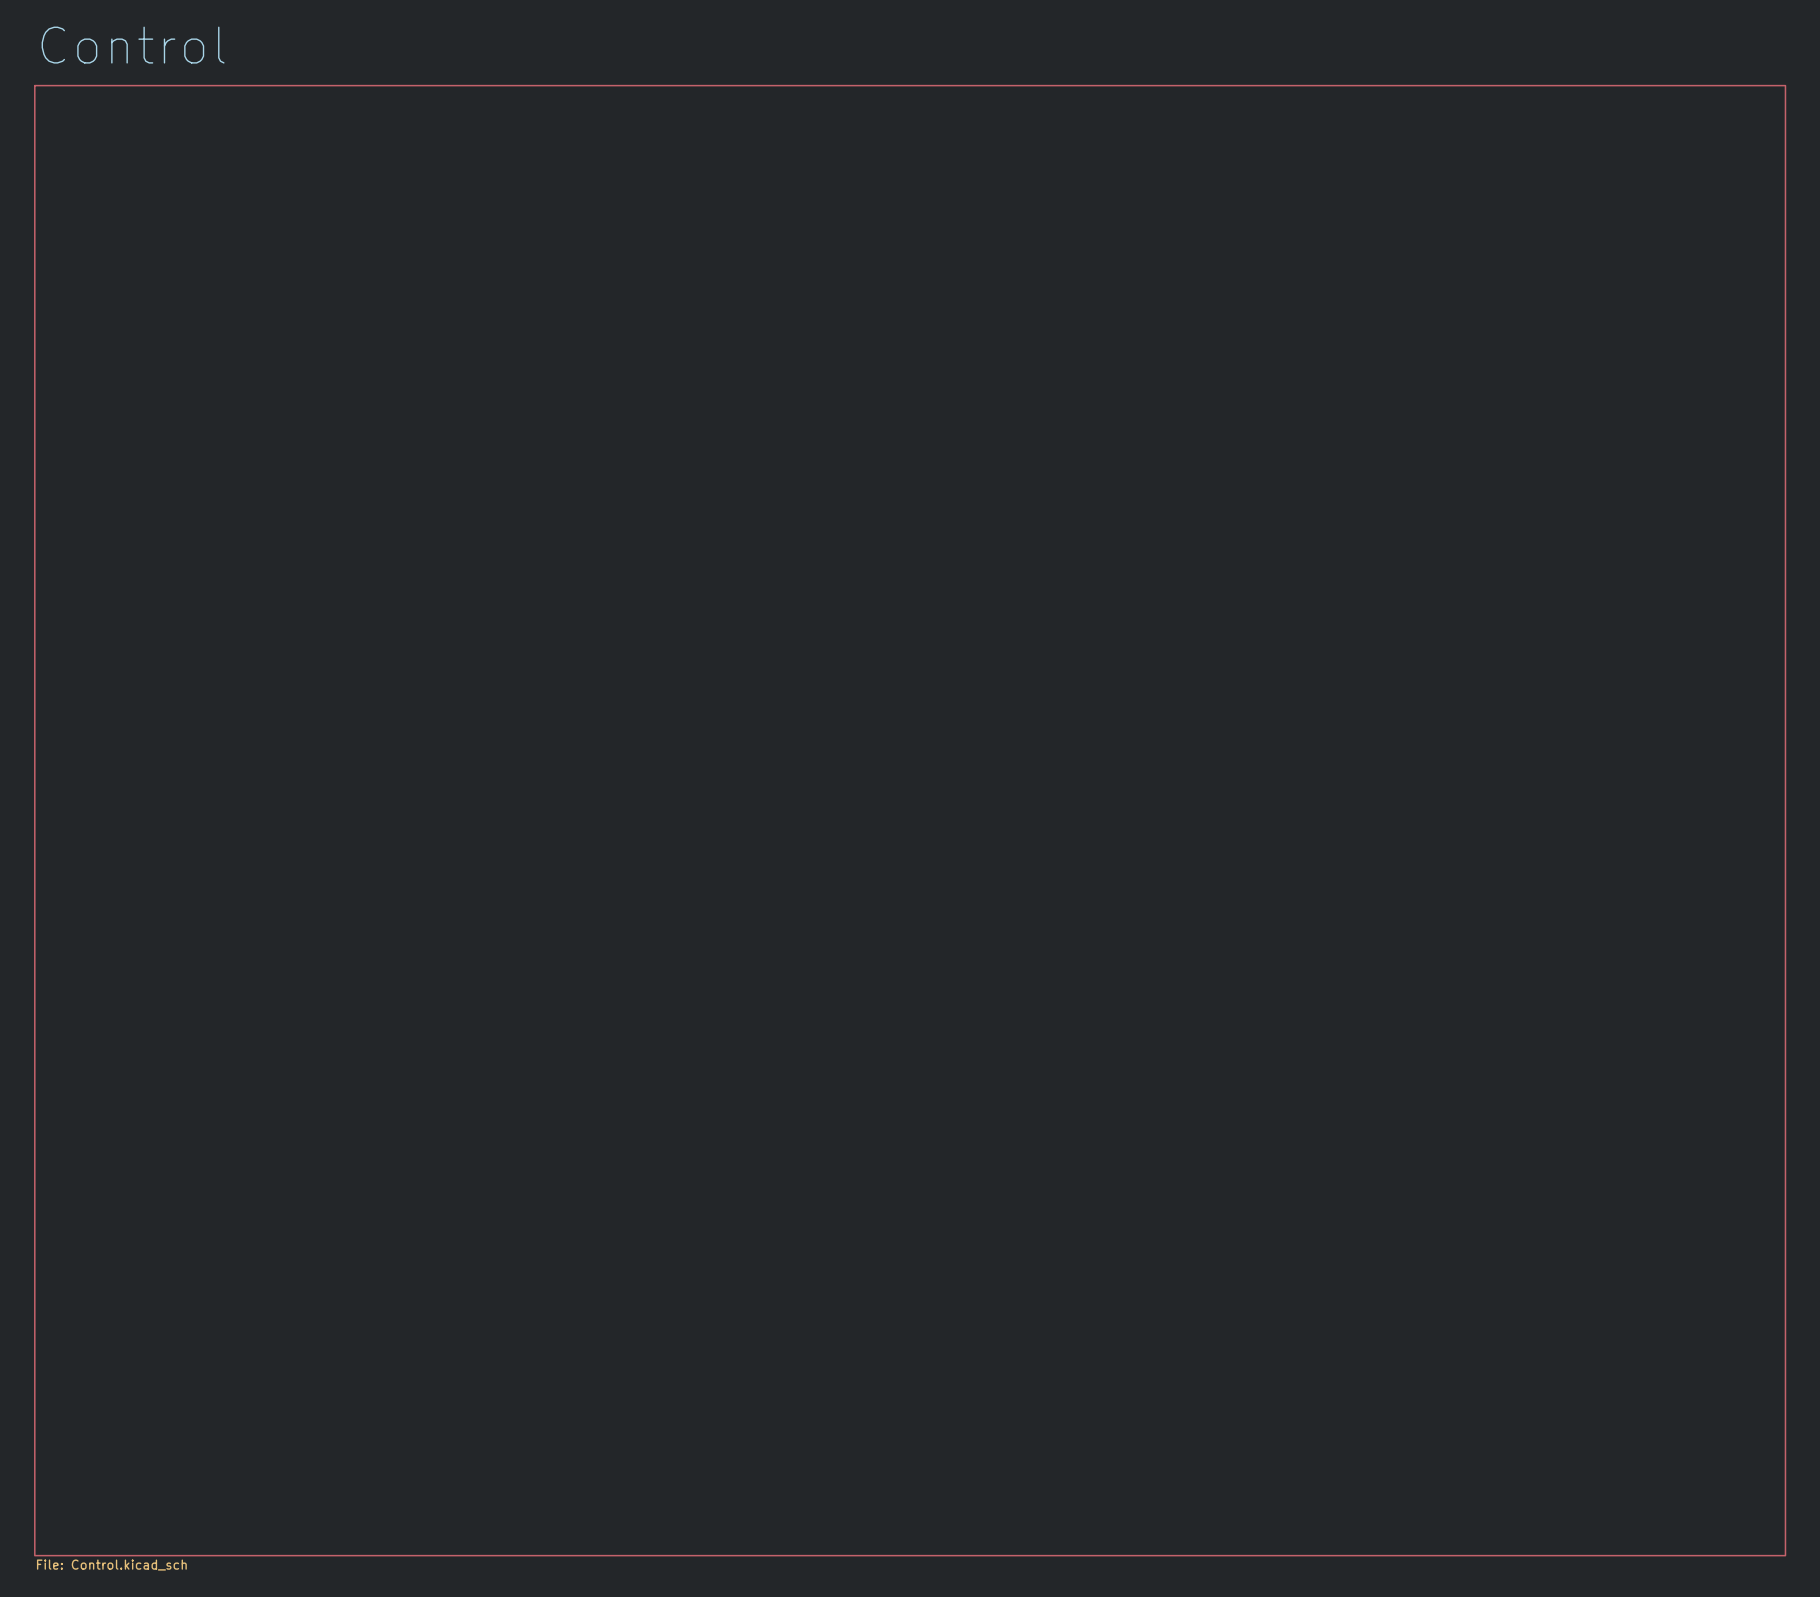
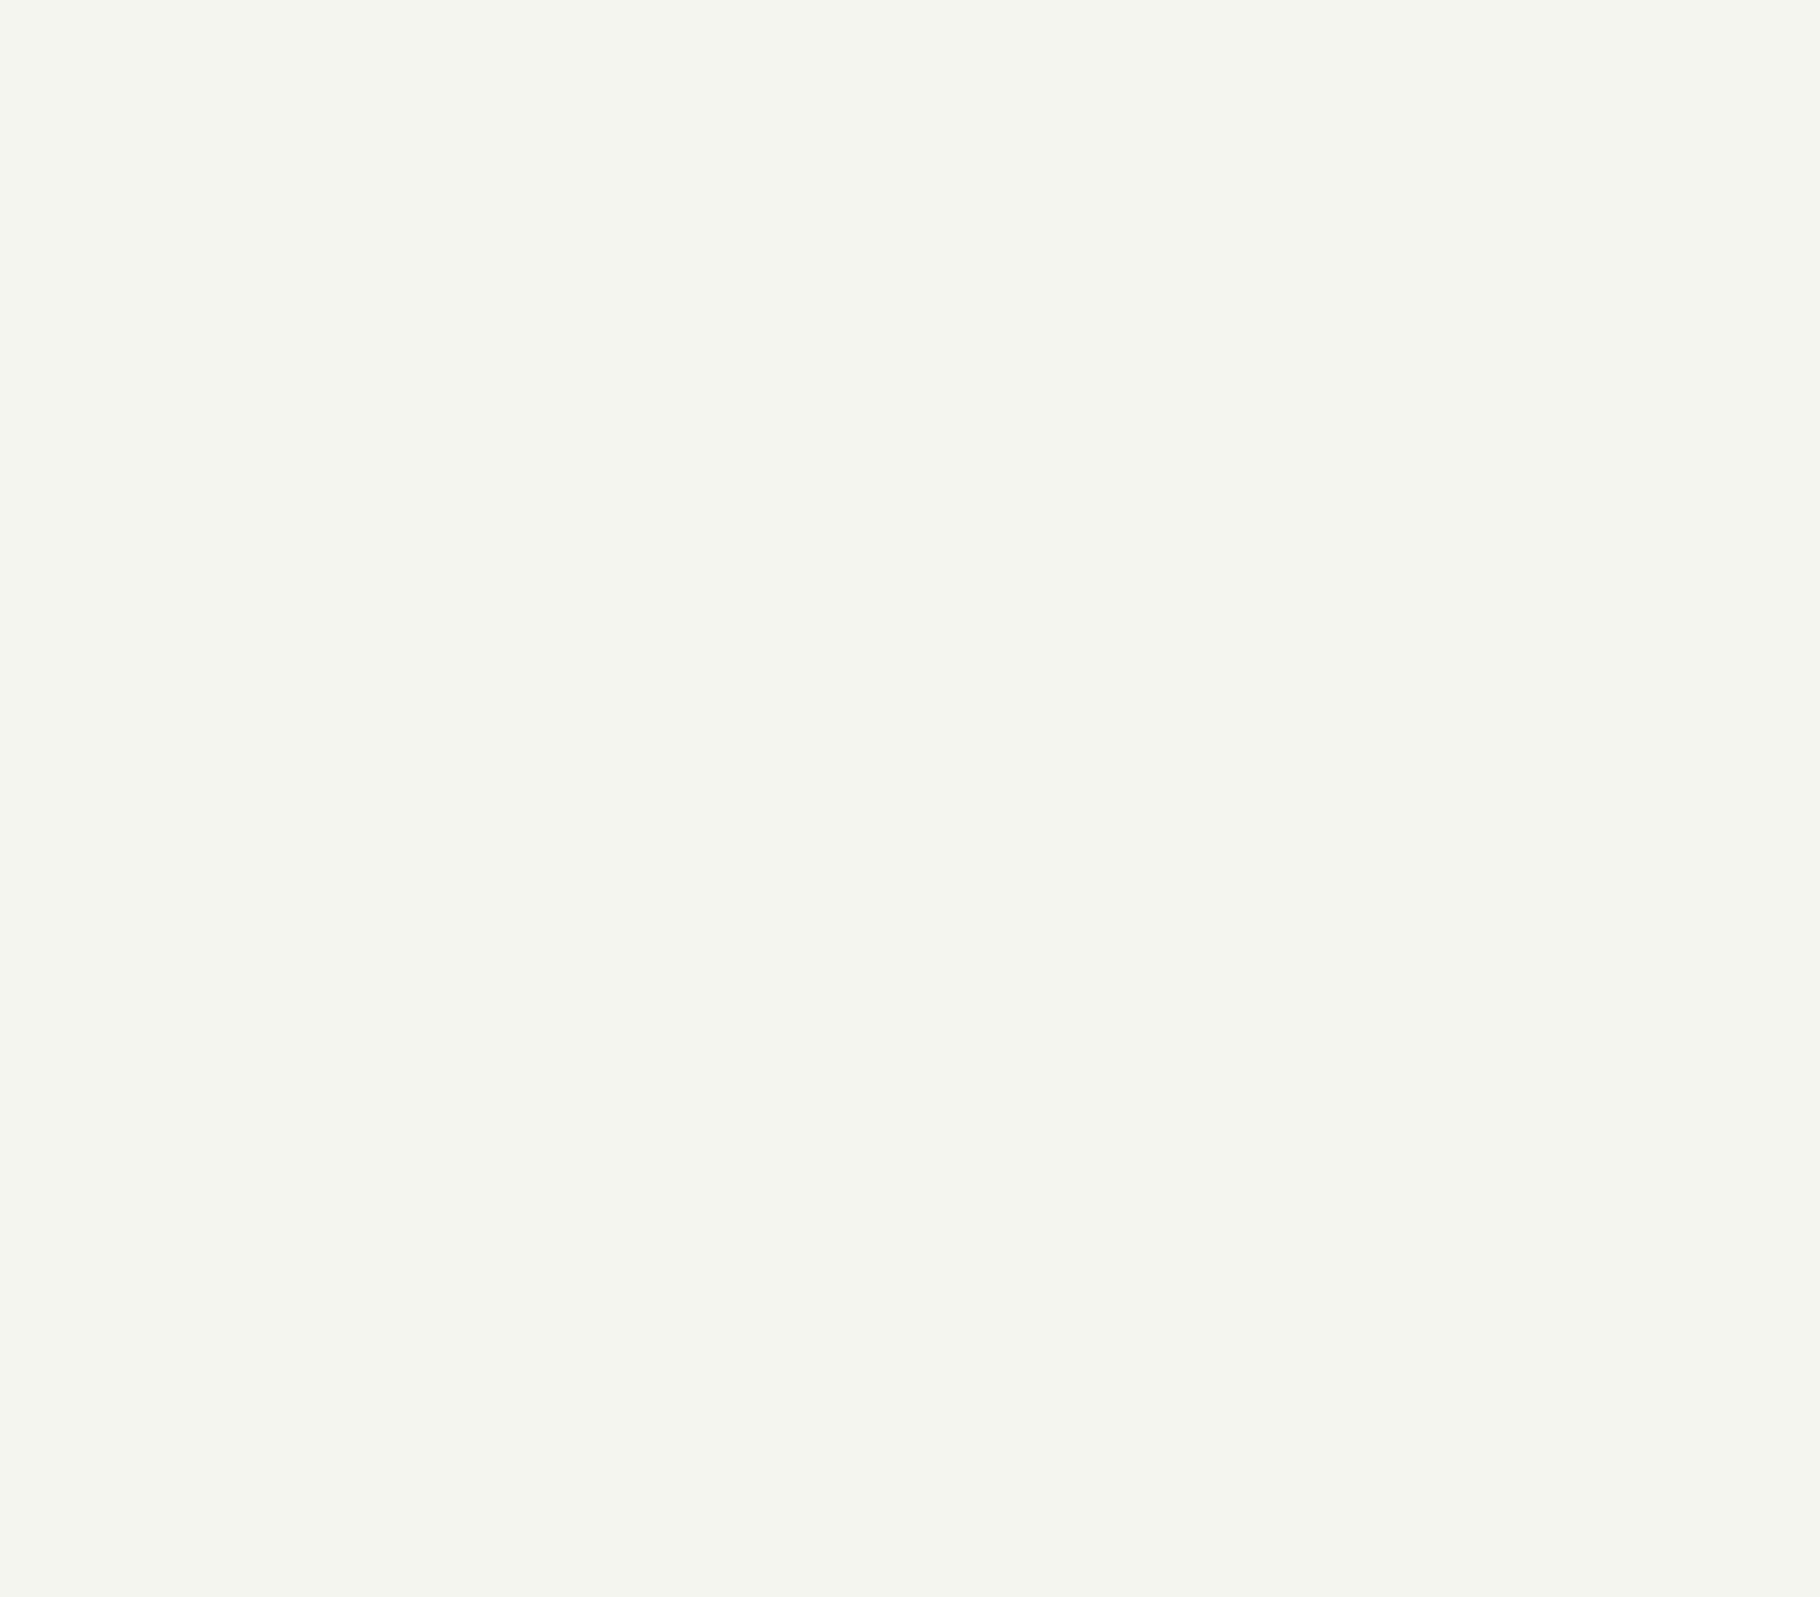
sheet Control: File: Control.kicad_sch (910, 820) -> none

